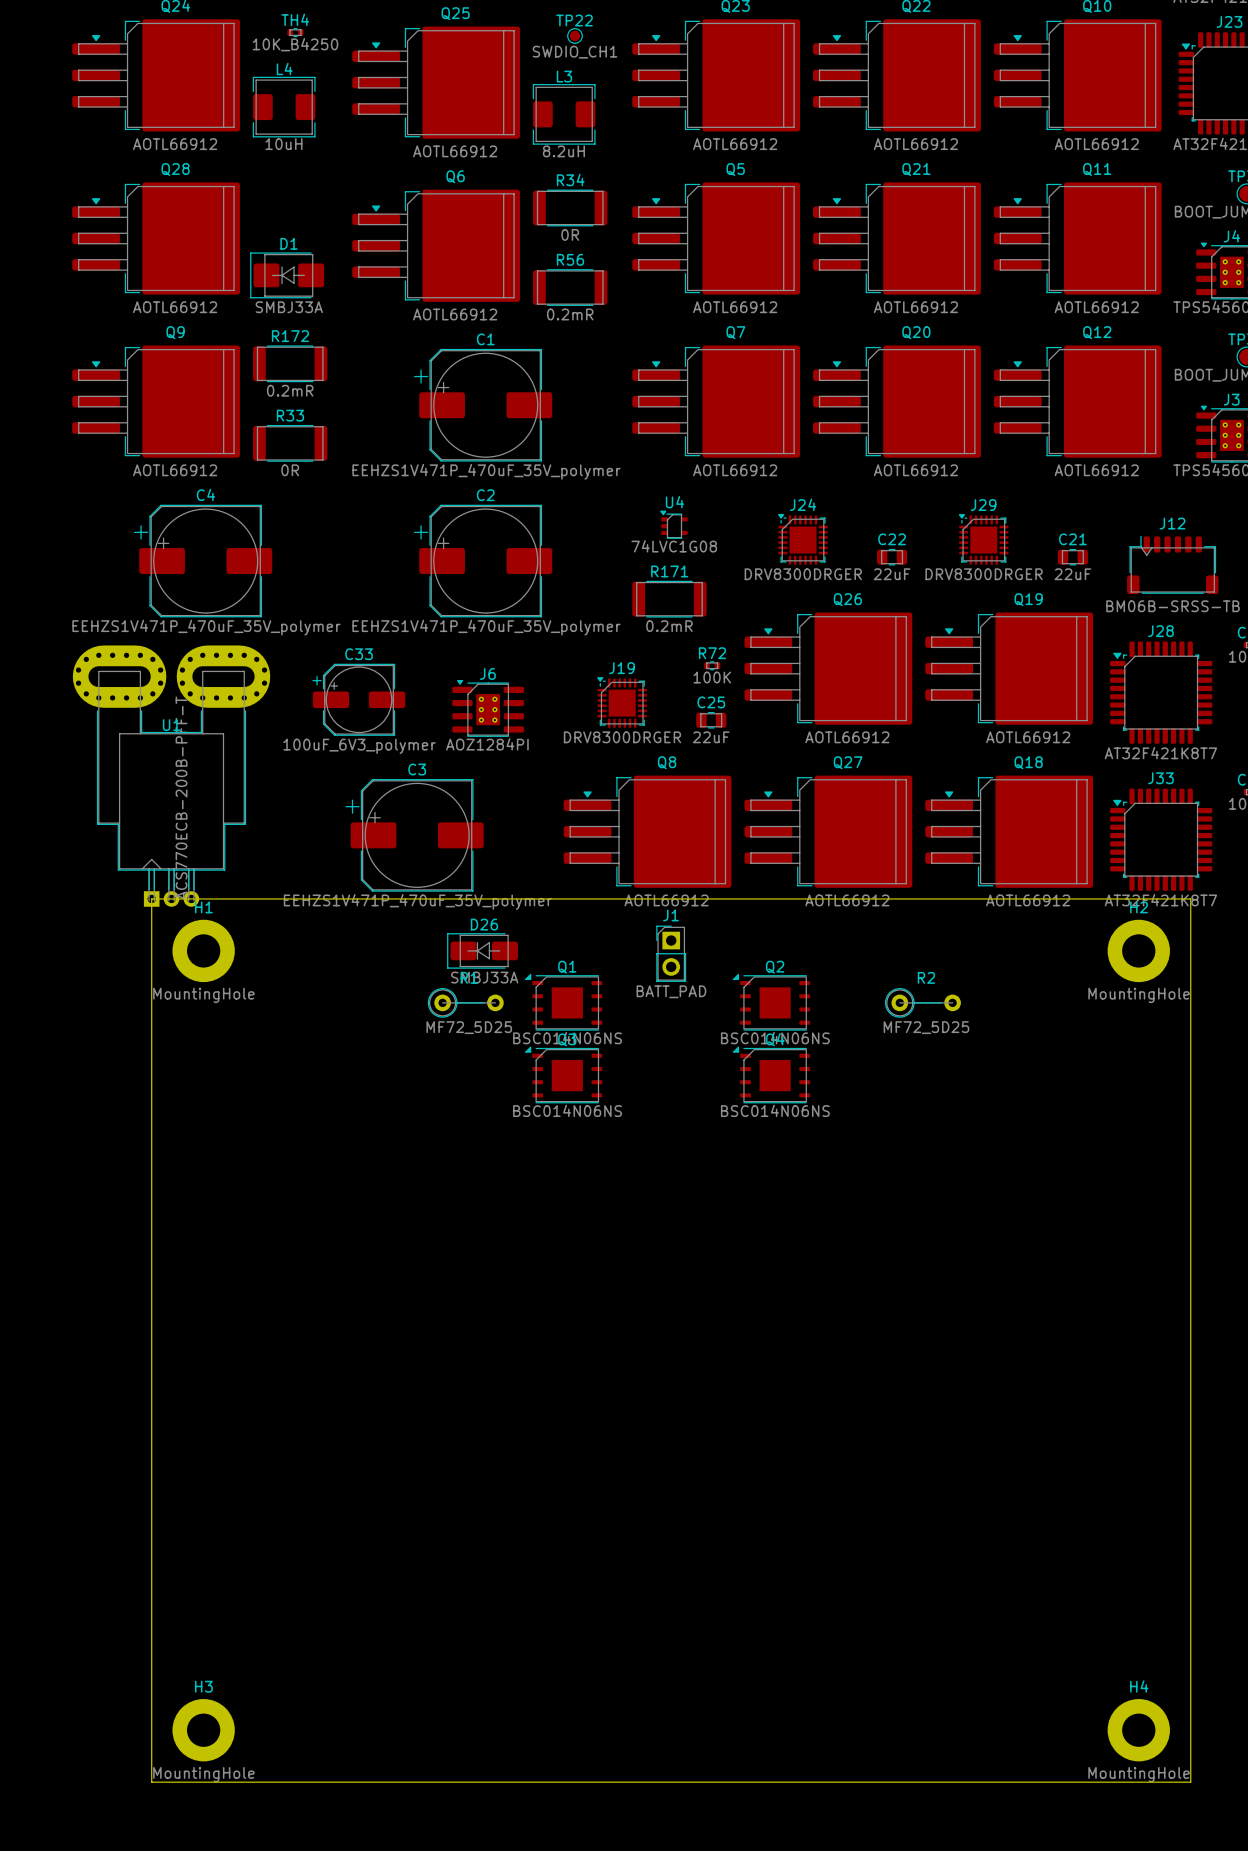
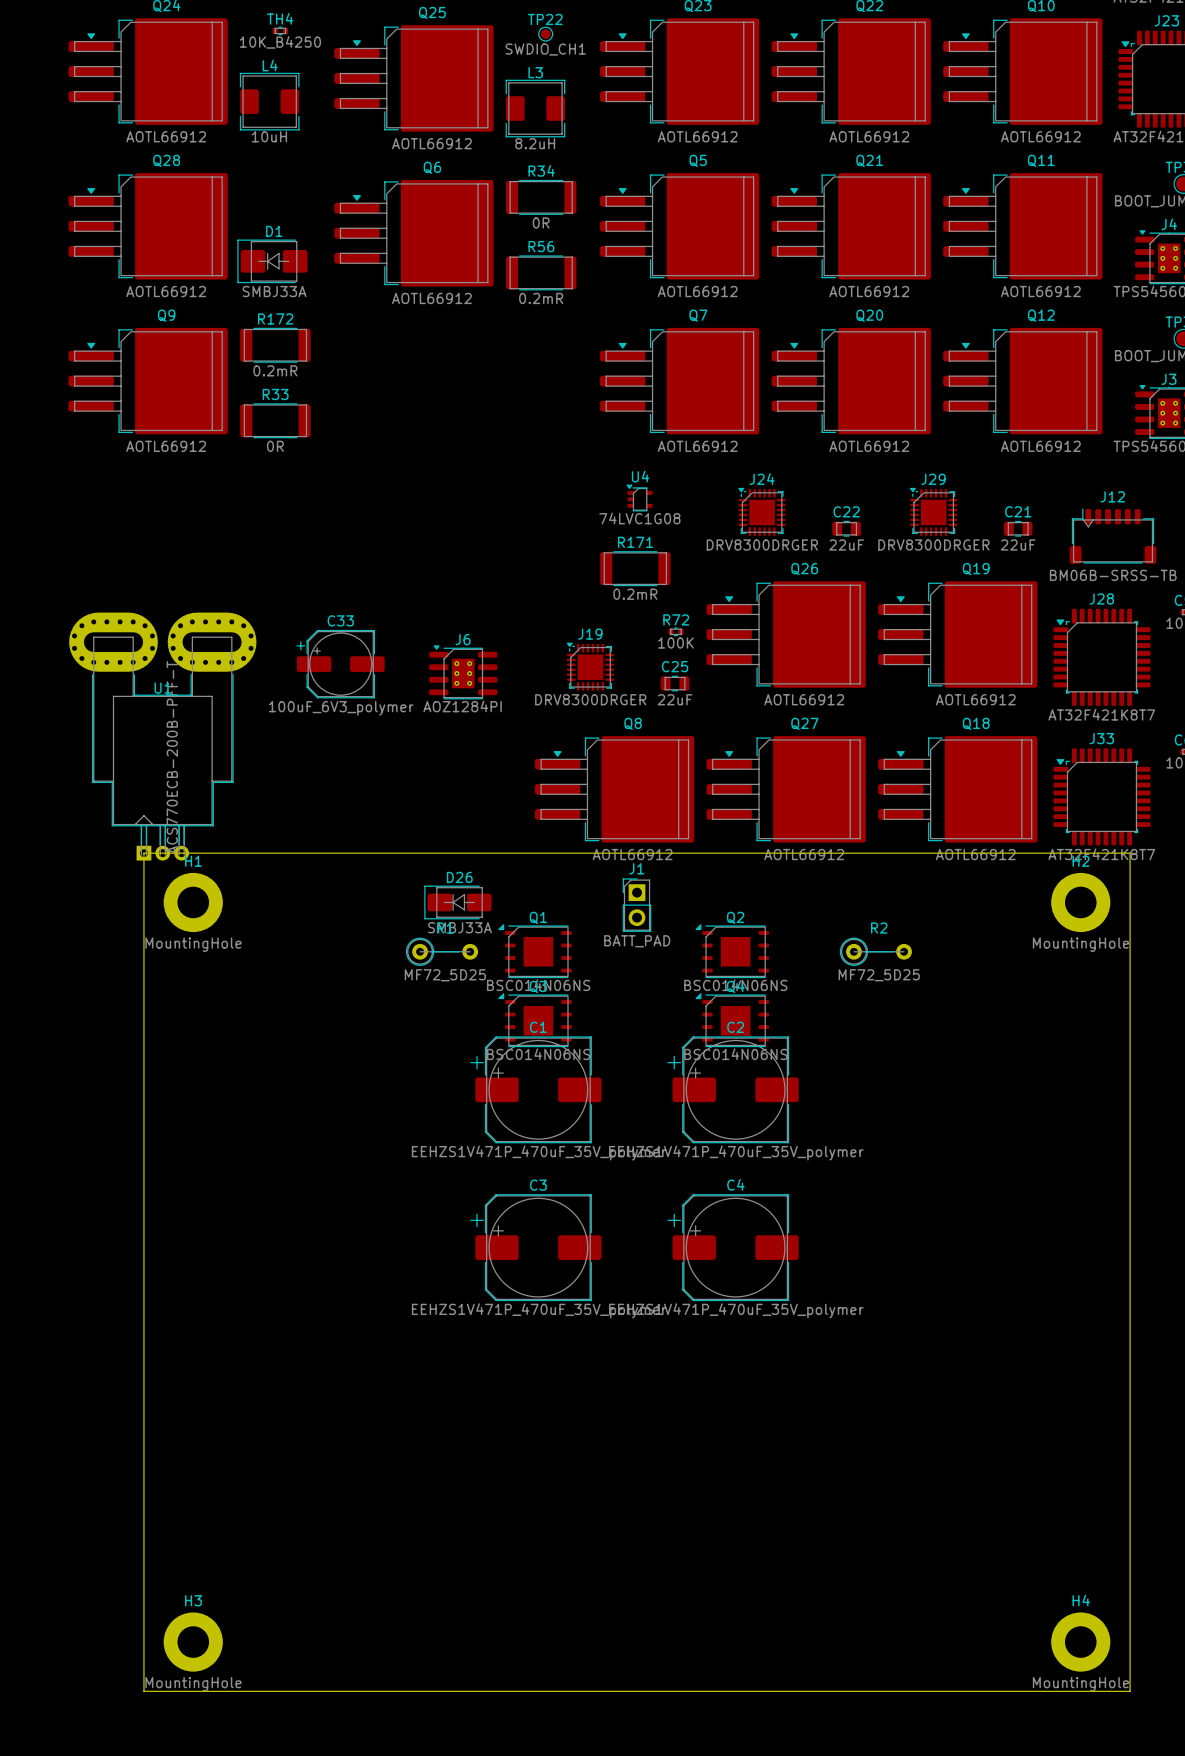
C1 position: (483, 405) -> (535, 1089)
C4 position: (203, 561) -> (733, 1247)
C2 position: (483, 561) -> (733, 1089)
C3 position: (414, 835) -> (535, 1247)

